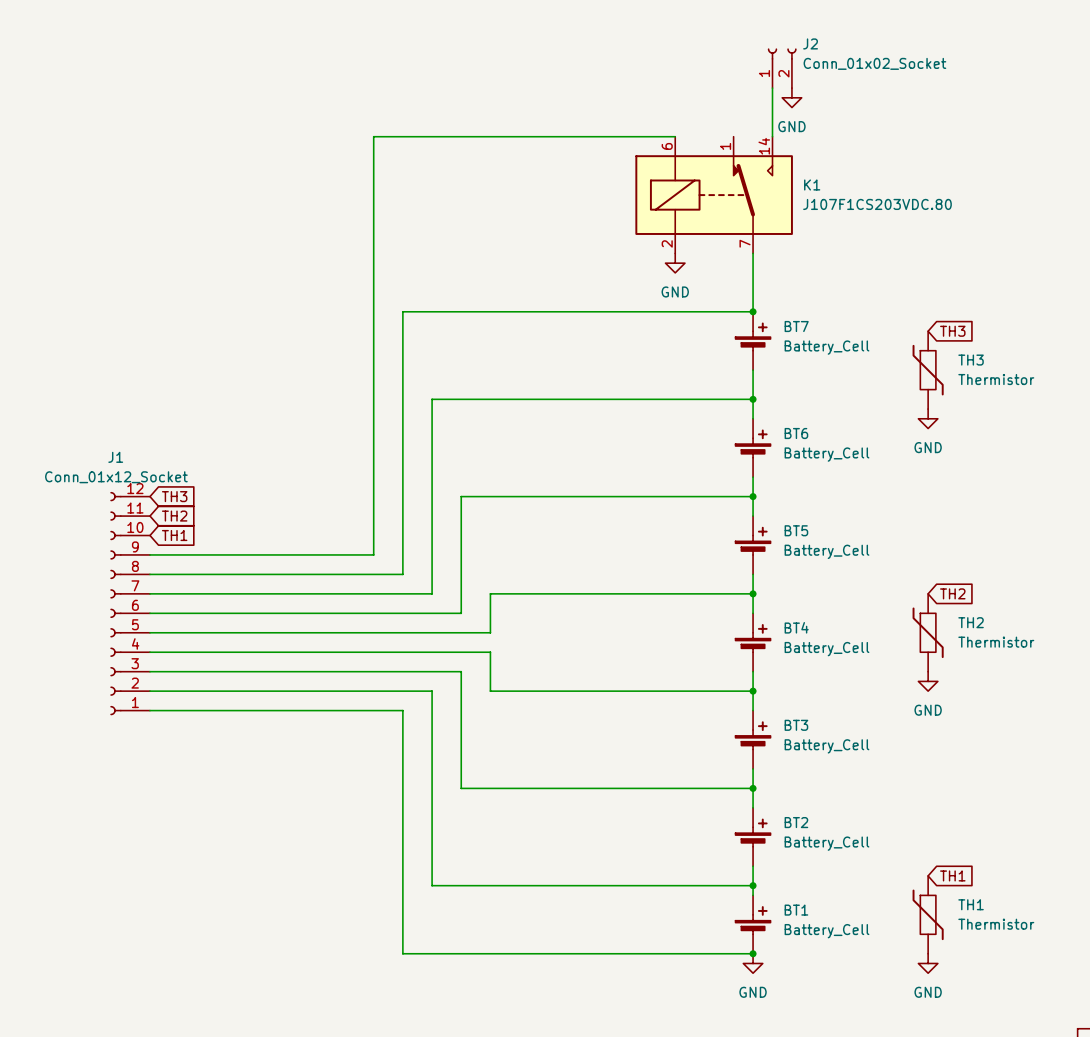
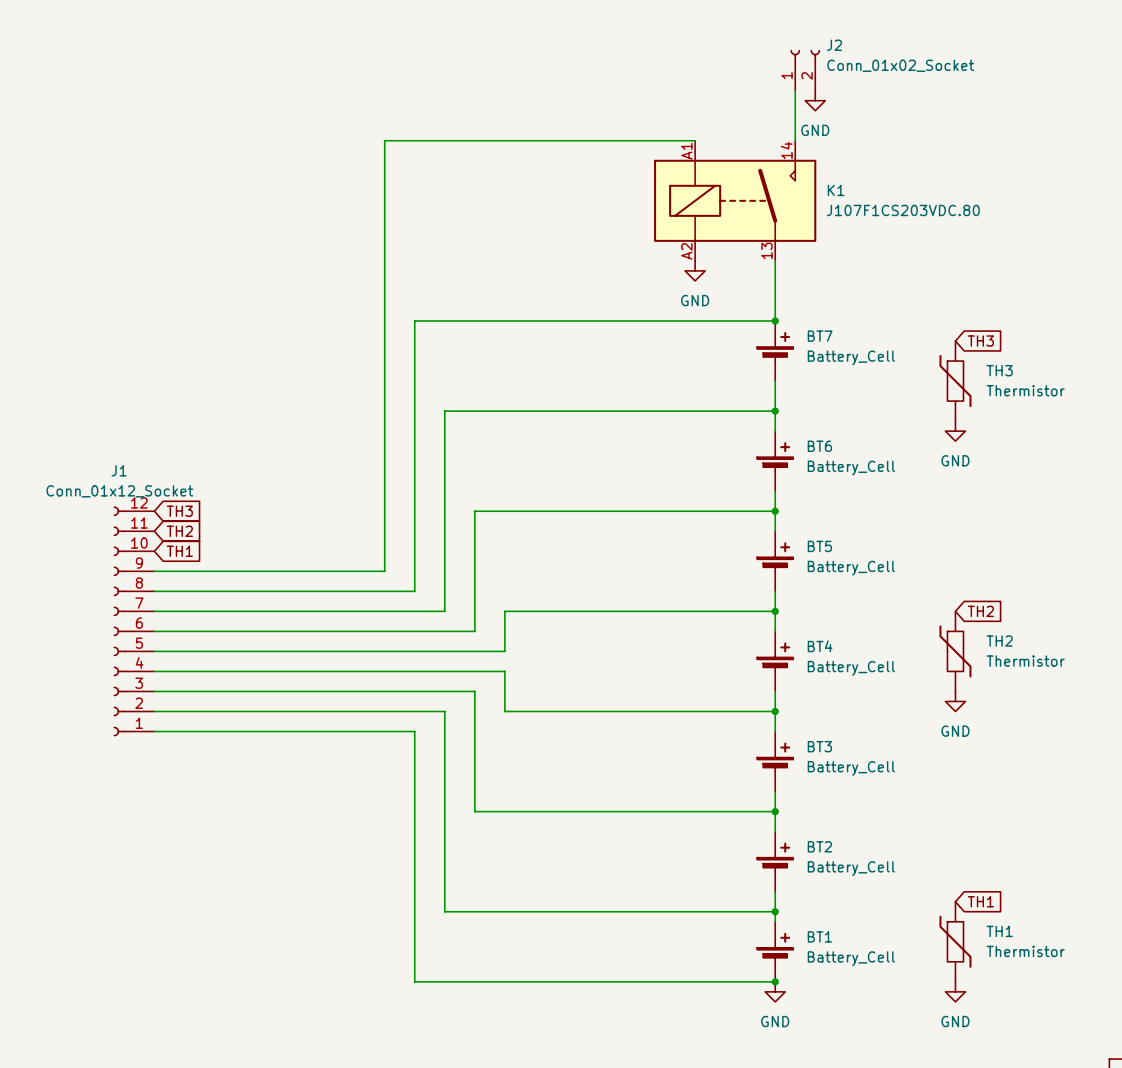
K1 symbol: [635, 136, 793, 254] -> [654, 140, 817, 261]

